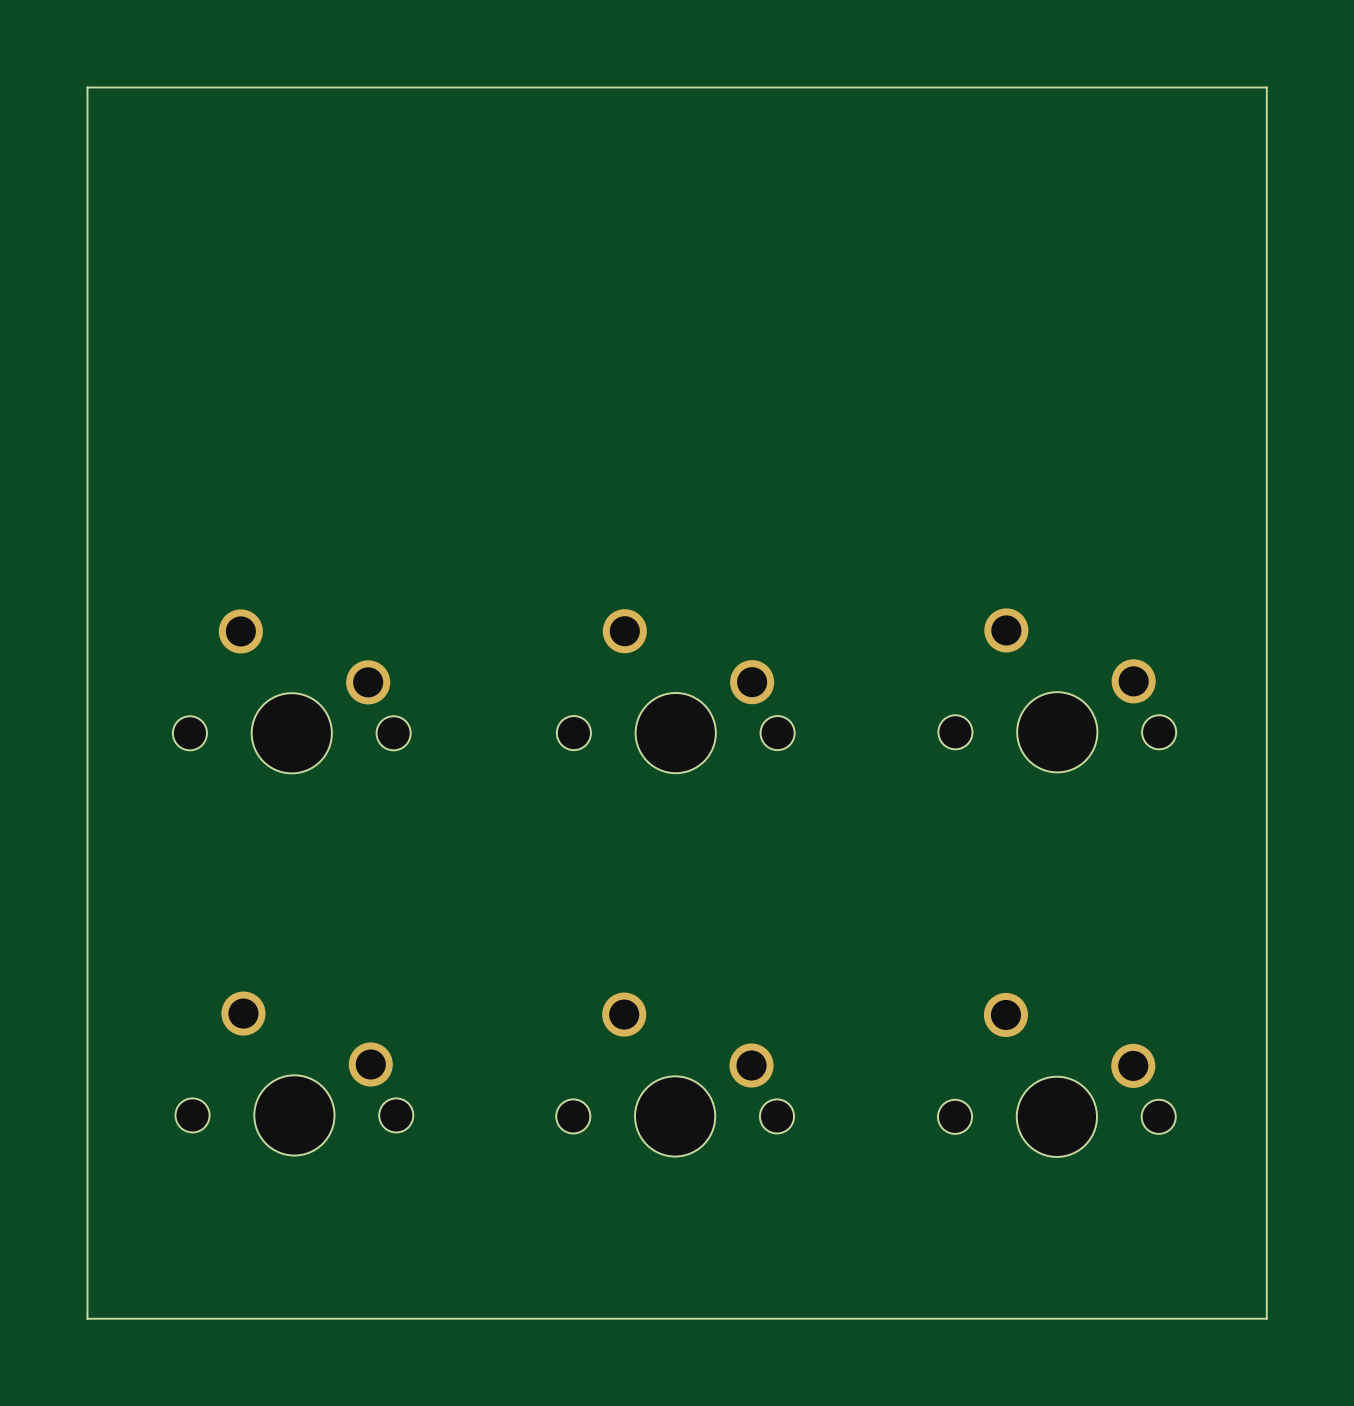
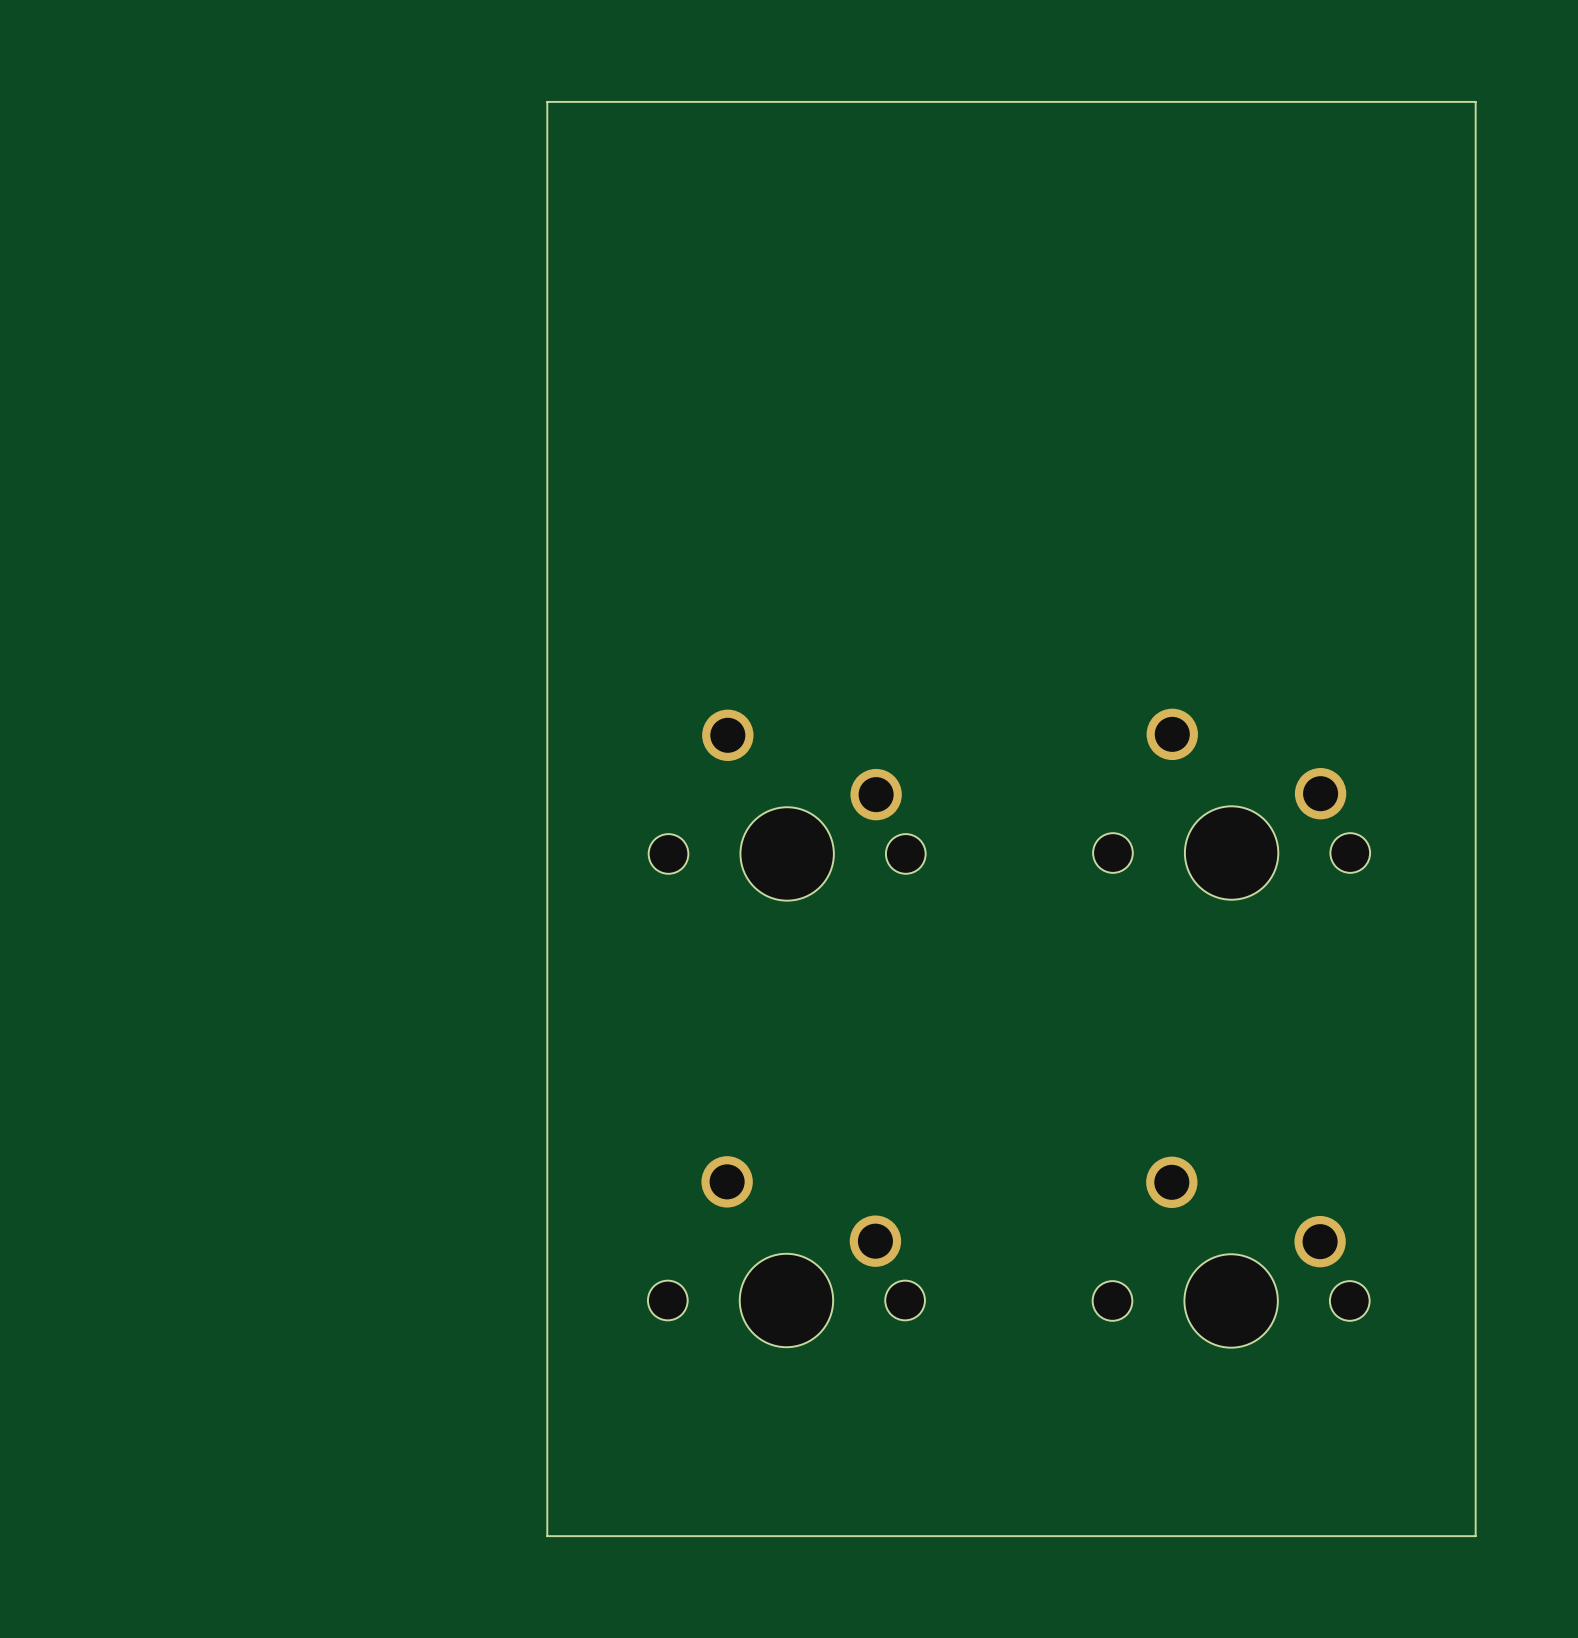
board edge: (469, 87) (87, 87) (87, 1318) (469, 1318) -> (547, 101) (547, 1536)
part: (291, 691) -> none
part: (294, 1073) -> none

